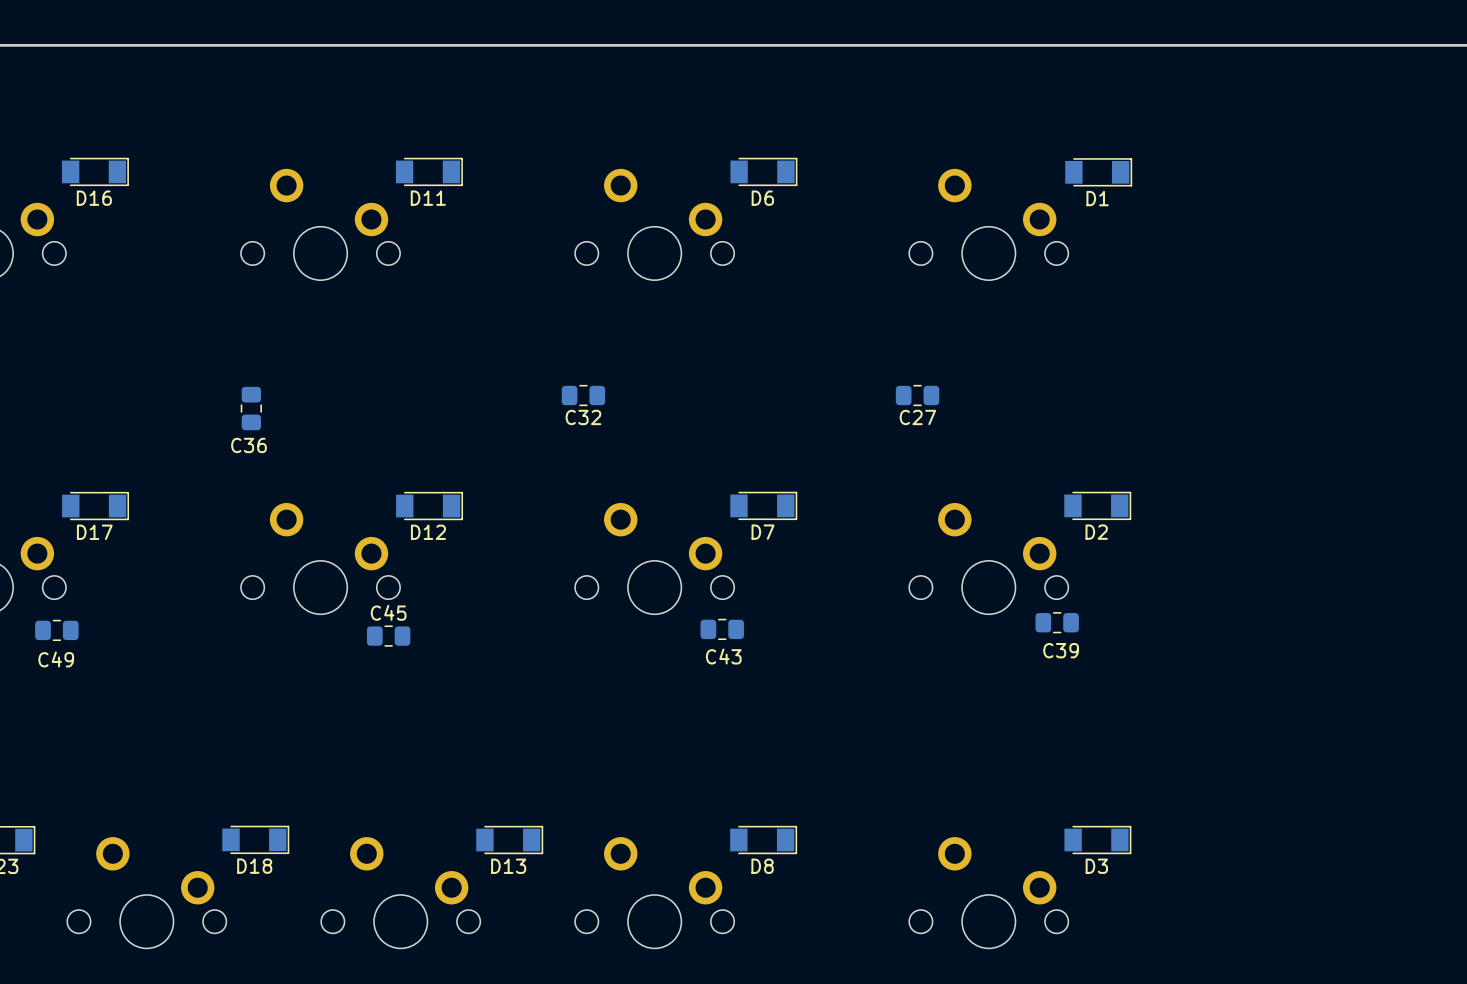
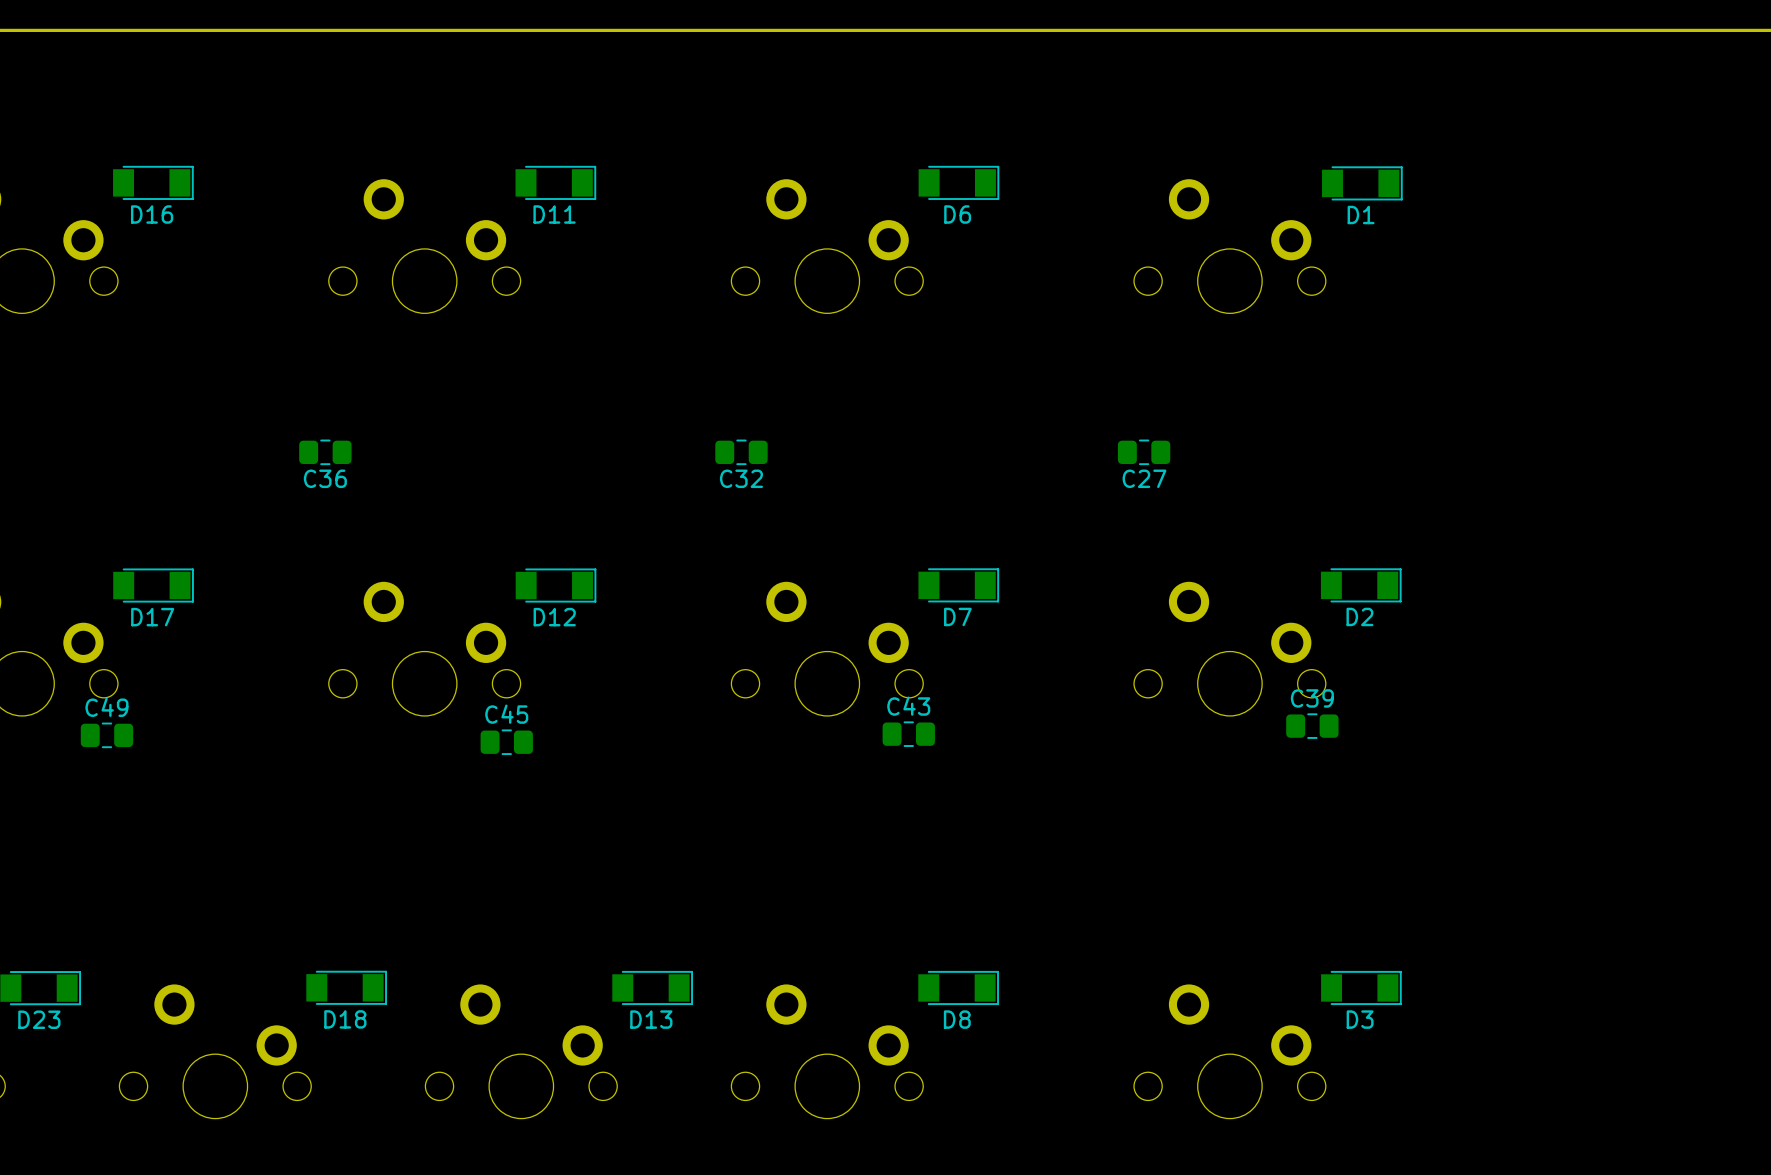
C36 rotation: 0° (251, 408) -> 90° clockwise (325, 452)
C39 name position: C39 (1061, 650) -> C39 (1312, 698)
C43 name position: C43 (723, 656) -> C43 (908, 706)
C49 name position: C49 (56, 659) -> C49 (106, 707)

